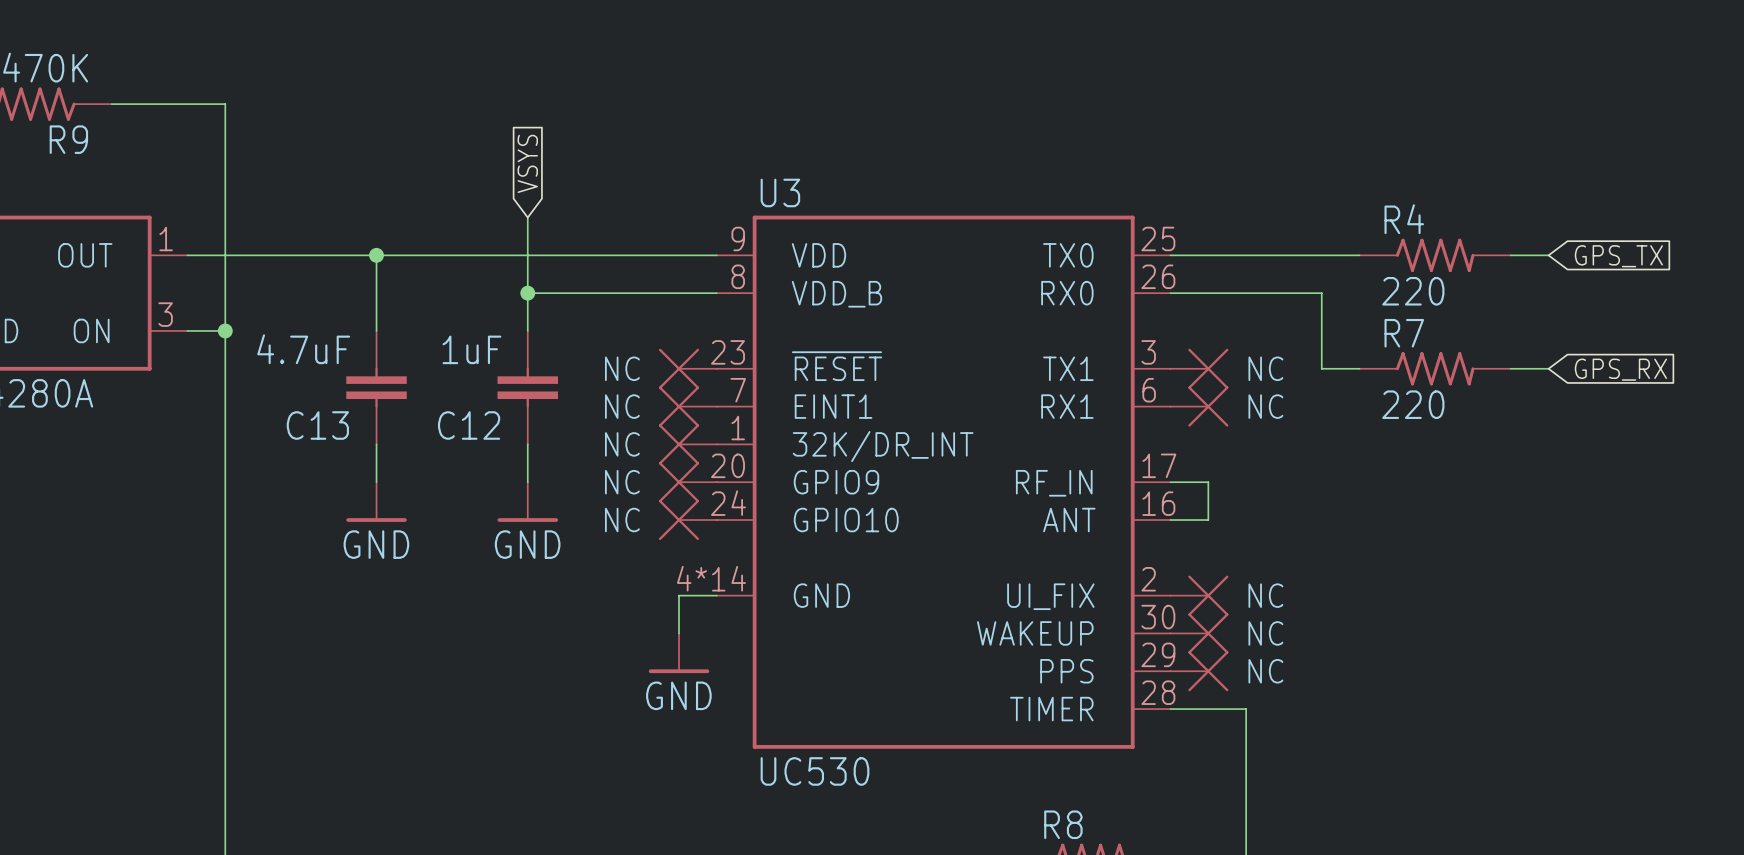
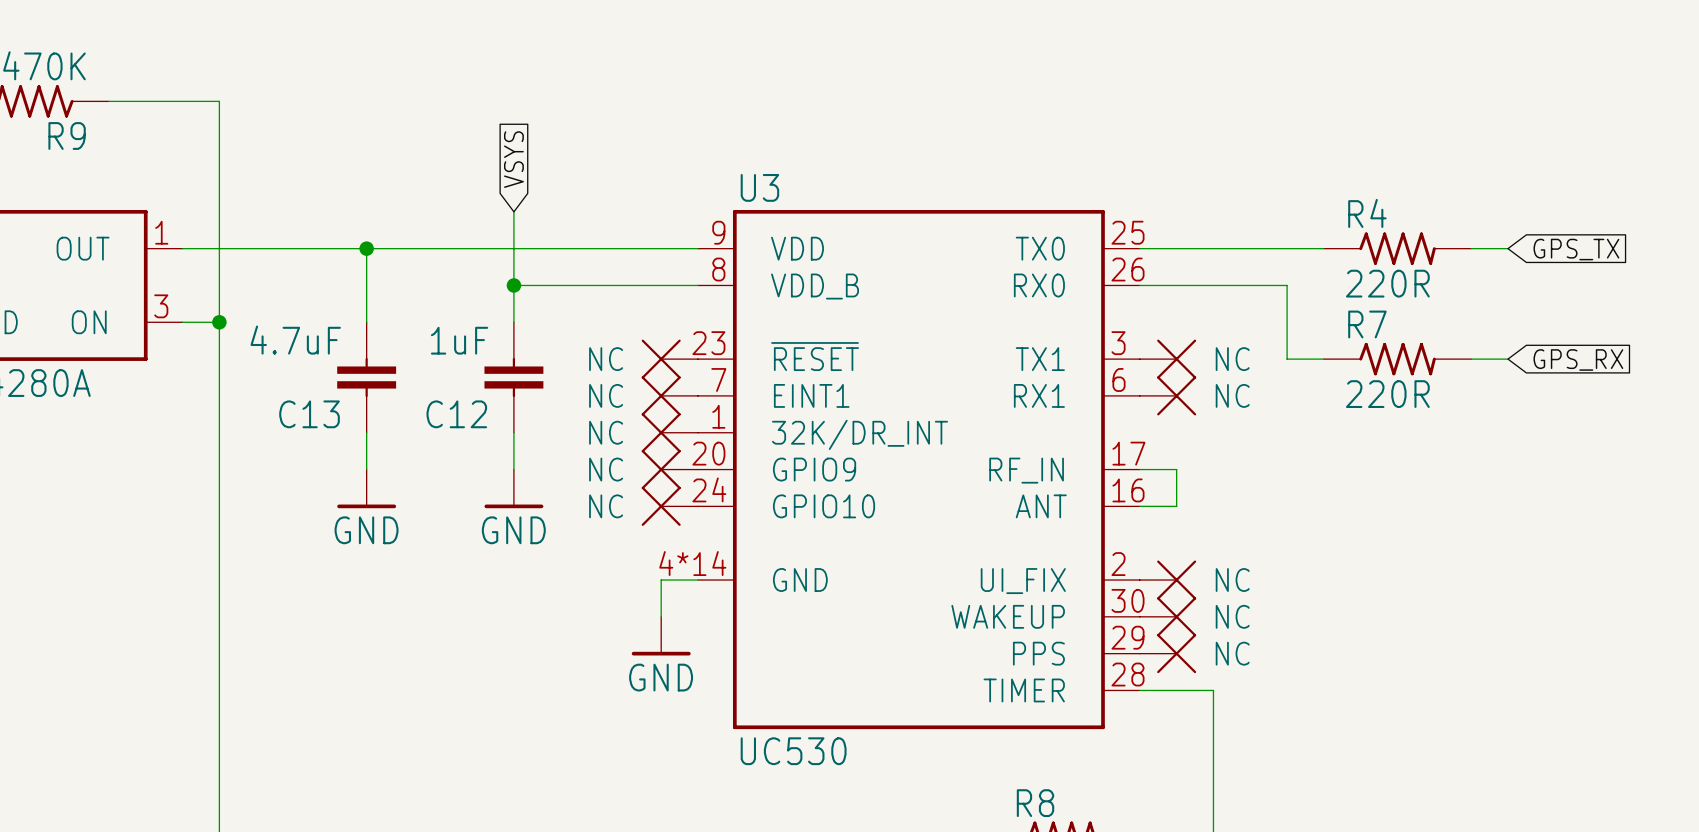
R4 value: 220 (1413, 291) -> 220R (1387, 283)
R7 value: 220 (1413, 404) -> 220R (1387, 394)

